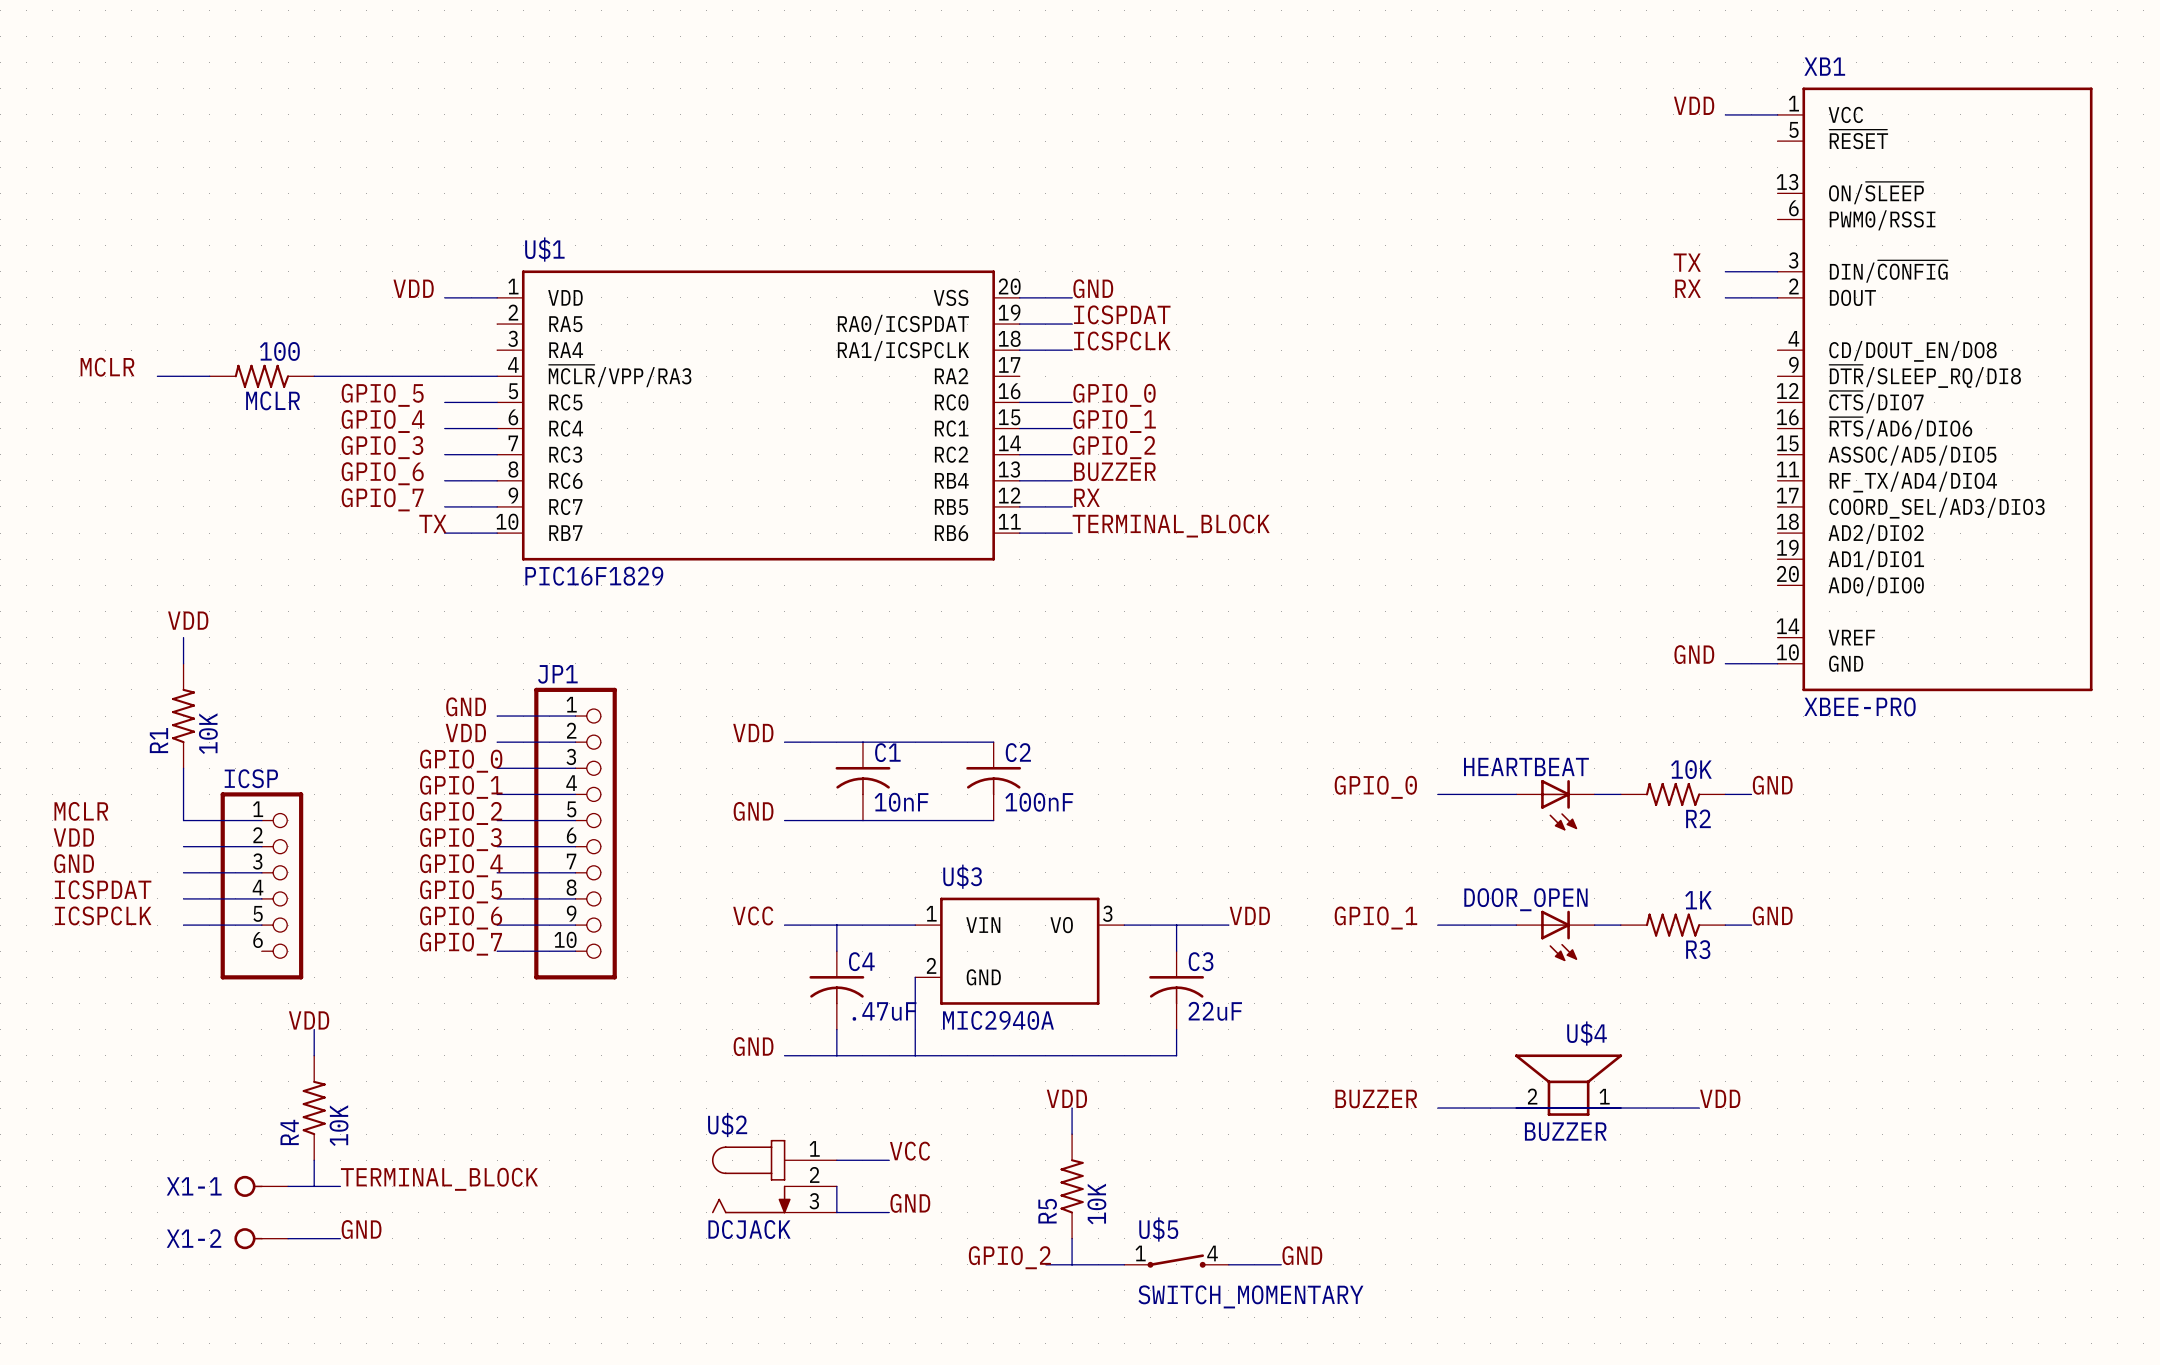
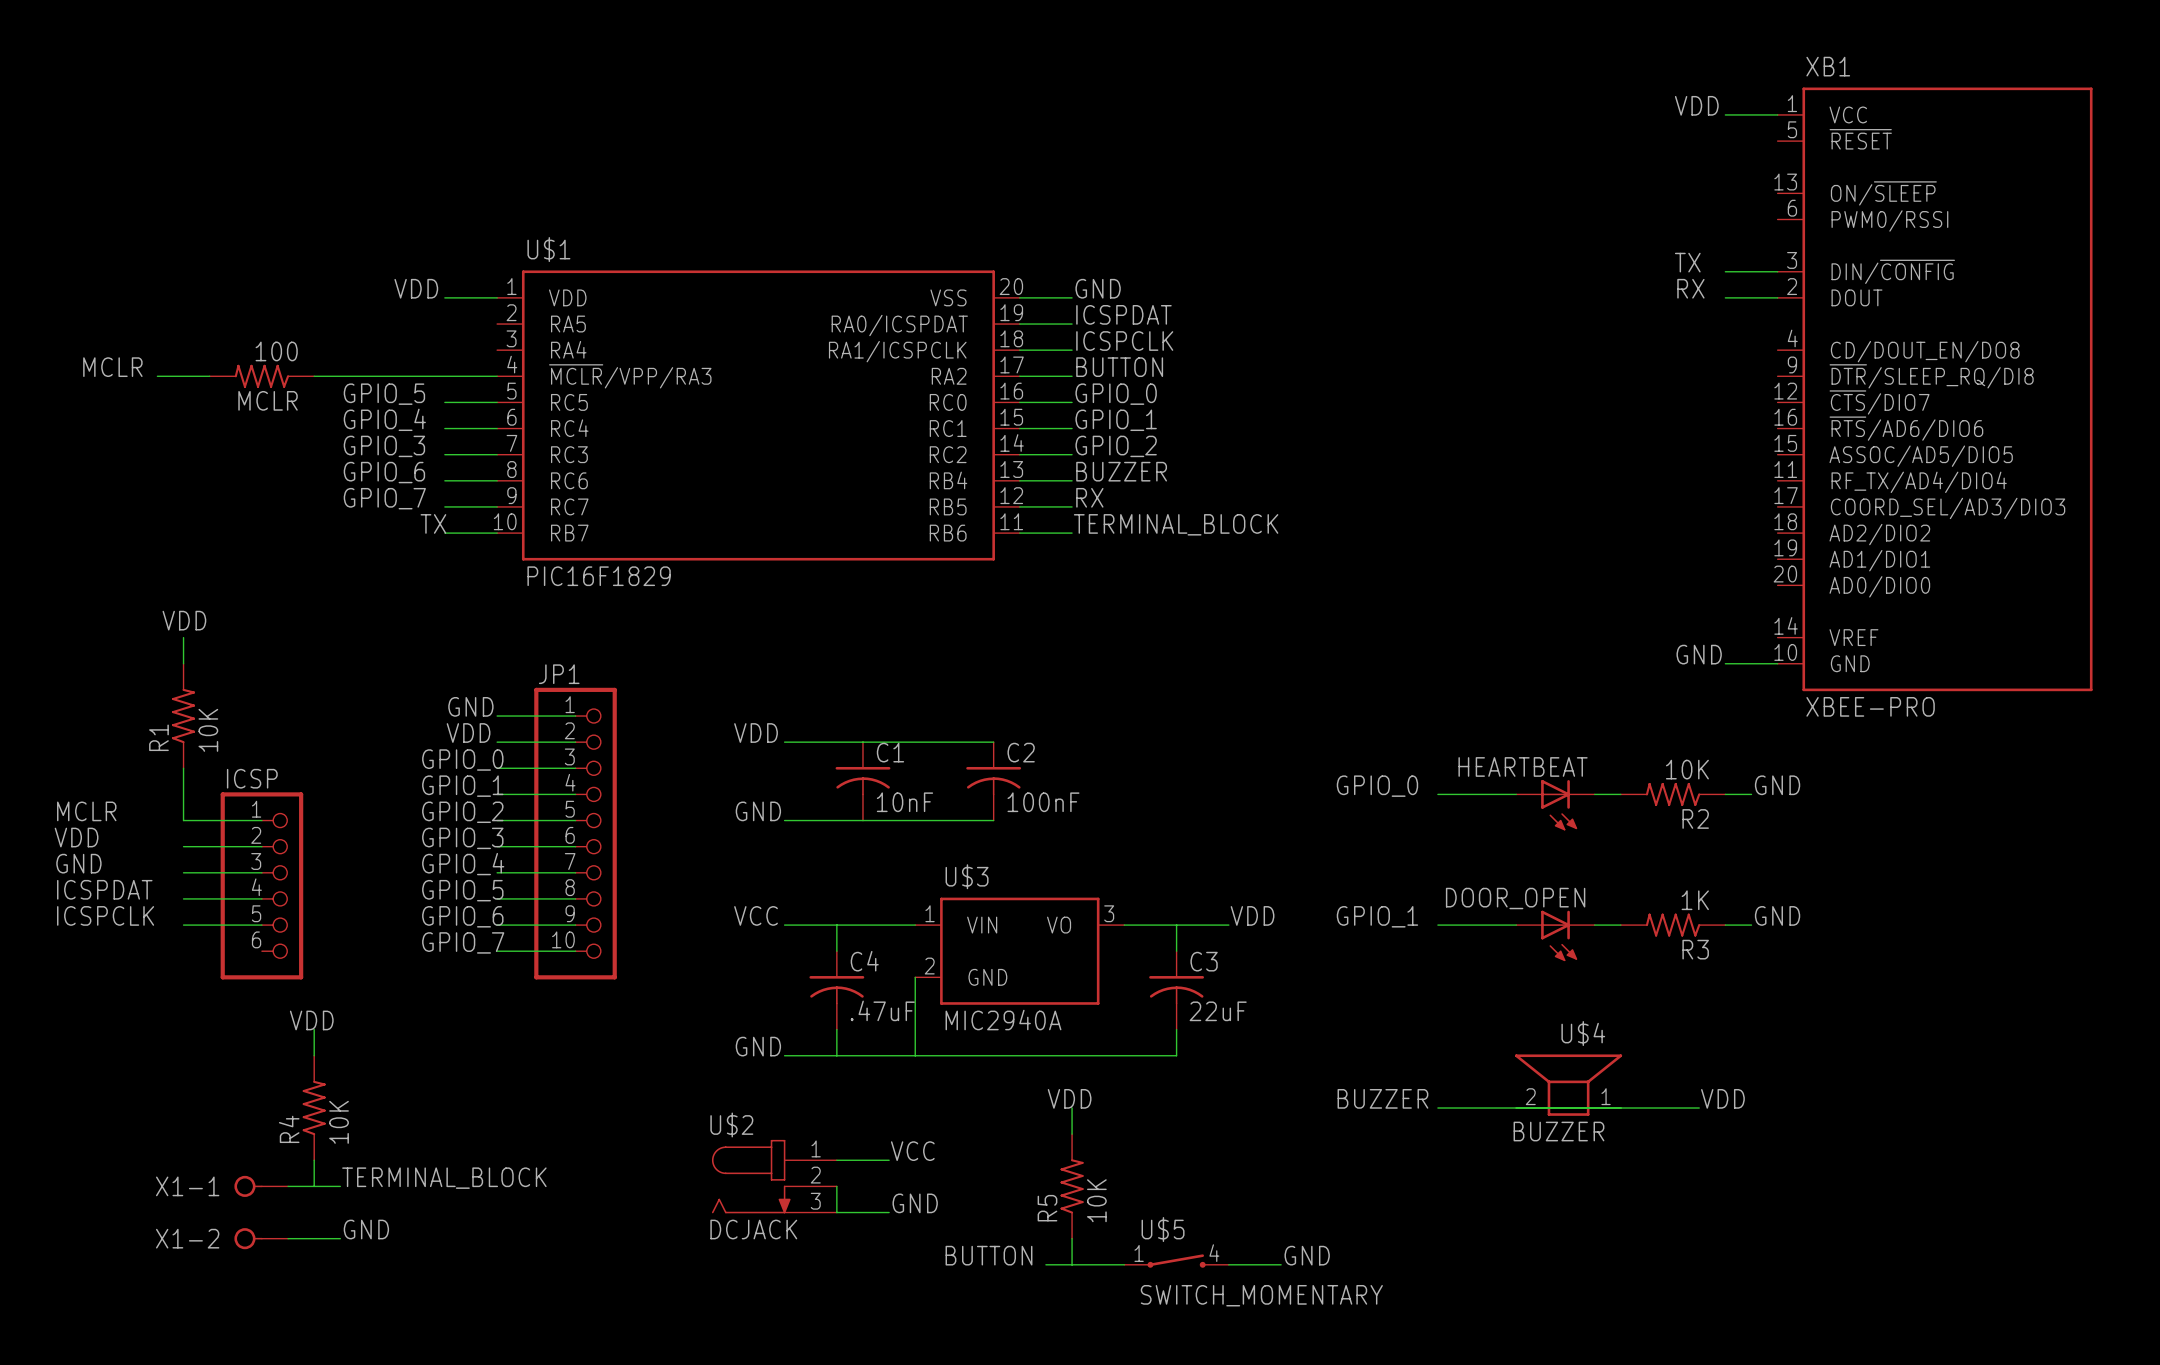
label: none -> BUTTON (1119, 367)
wire: none -> (1019, 376) (1072, 376)
label: none -> BUTTON (988, 1255)
label: GPIO_2 (1009, 1257) -> none

